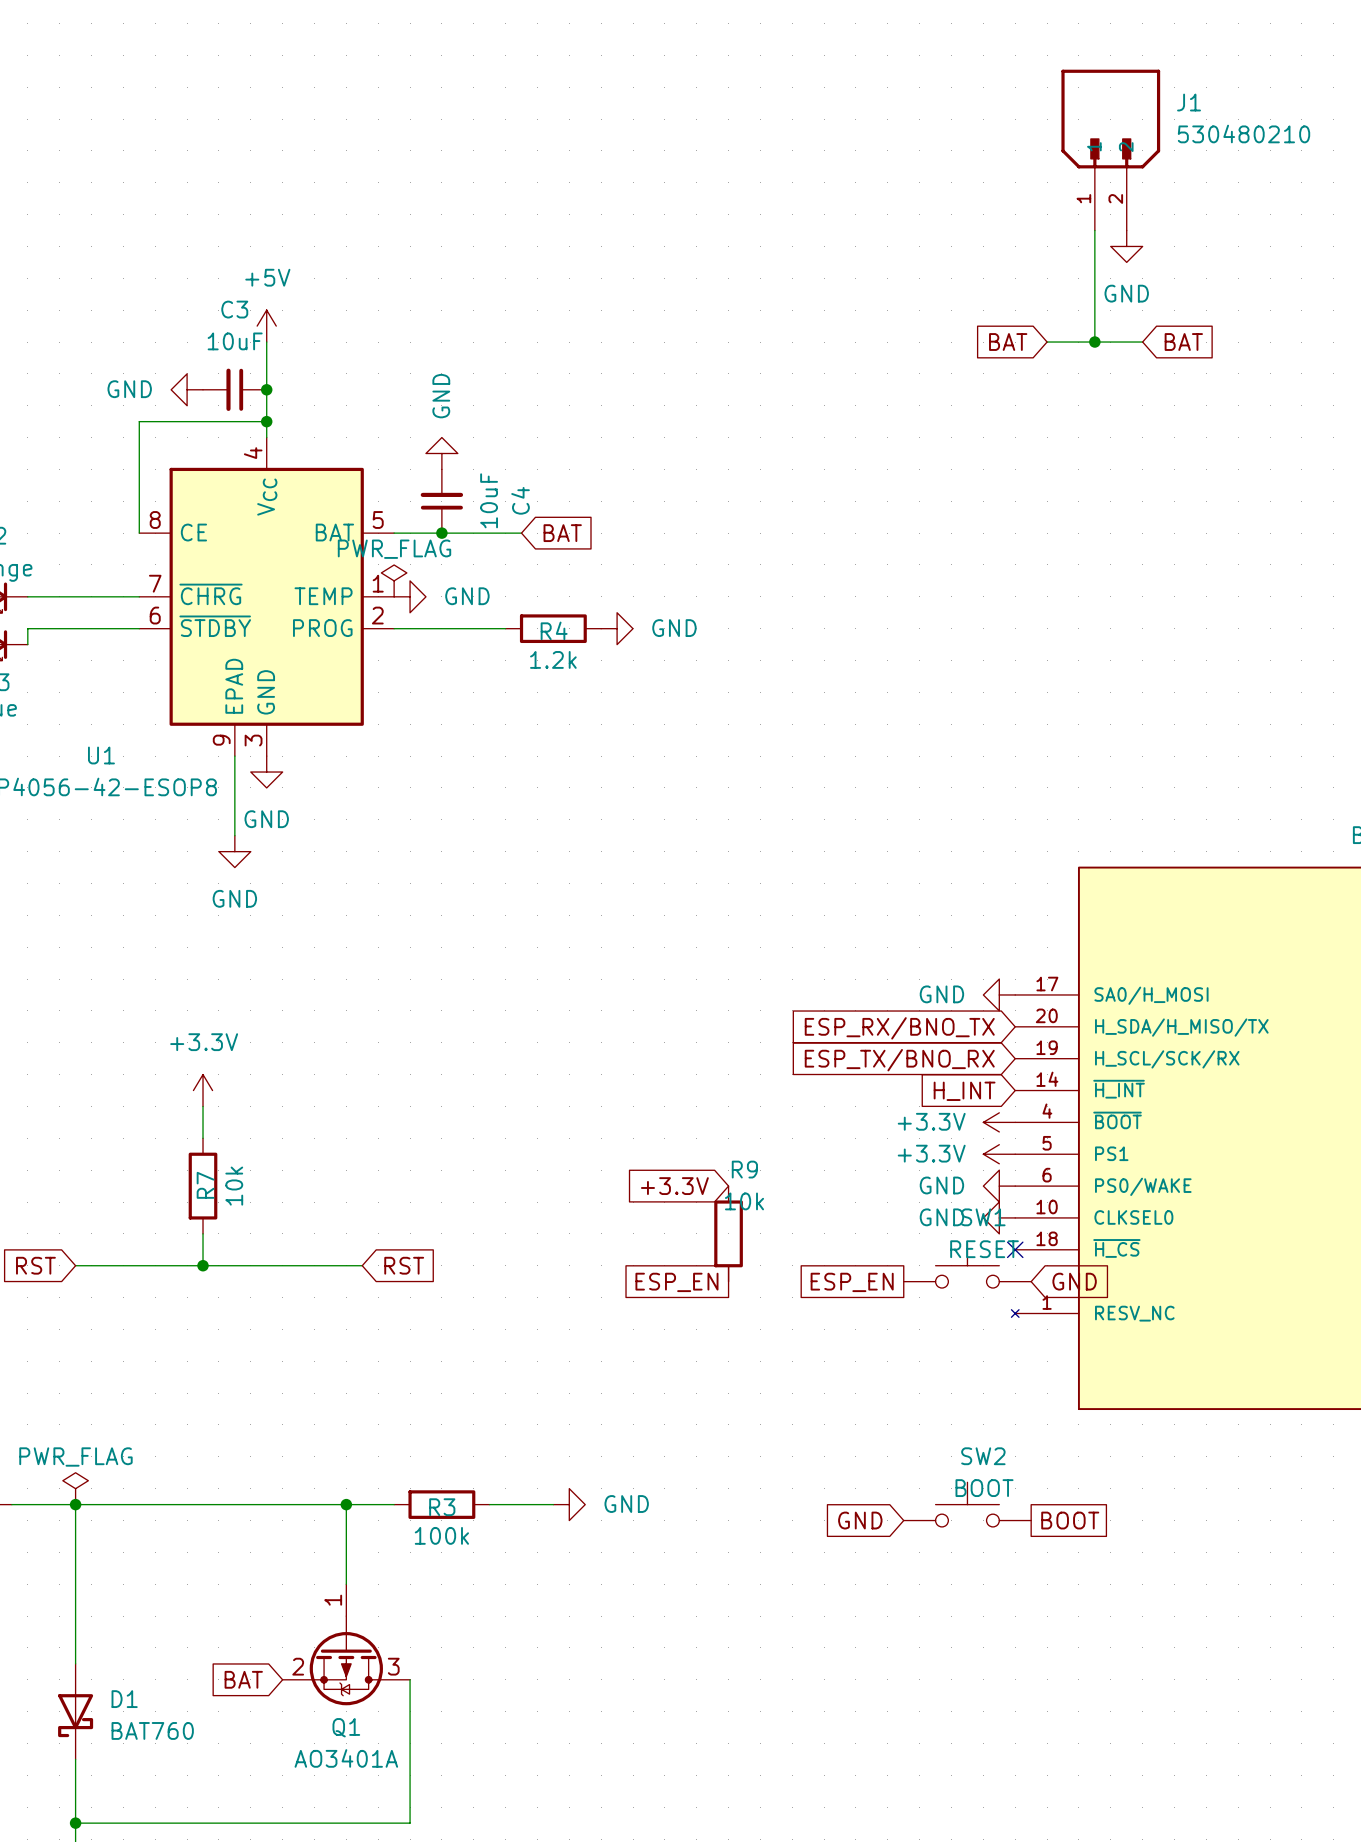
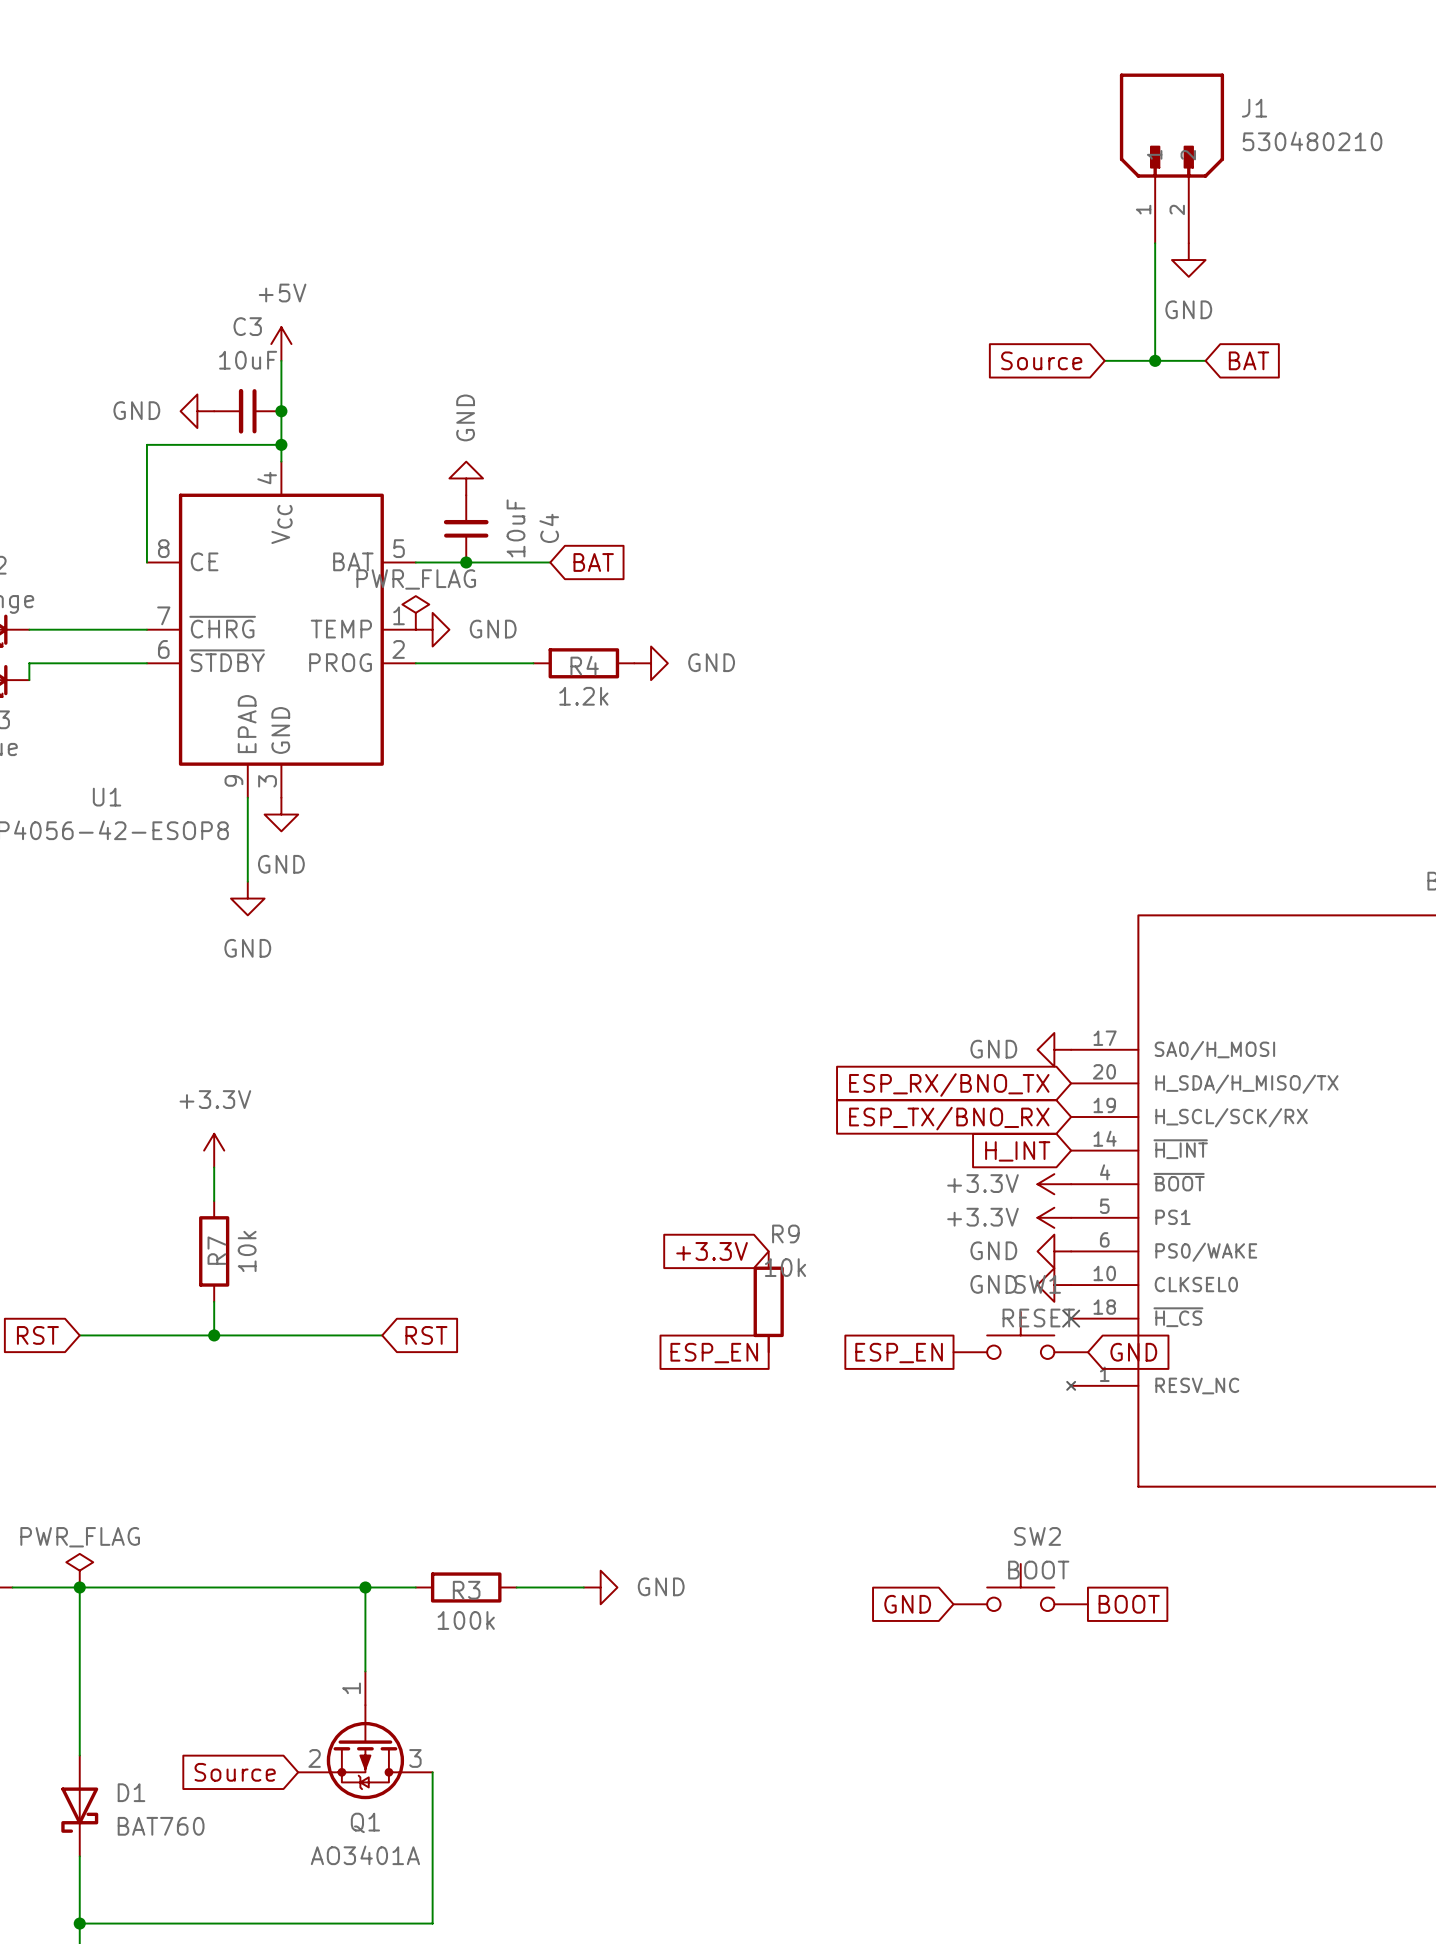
global label: BAT (1008, 342) -> Source (1041, 360)
global label: BAT (243, 1679) -> Source (235, 1772)

